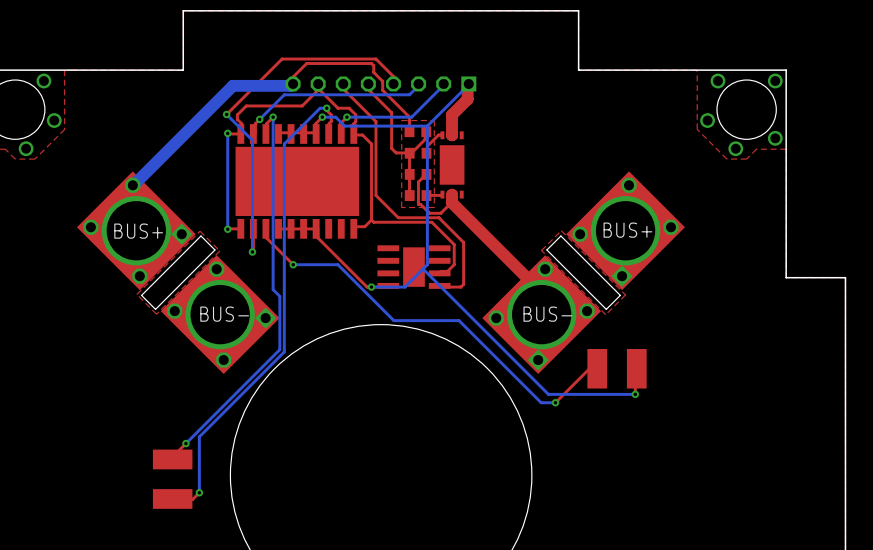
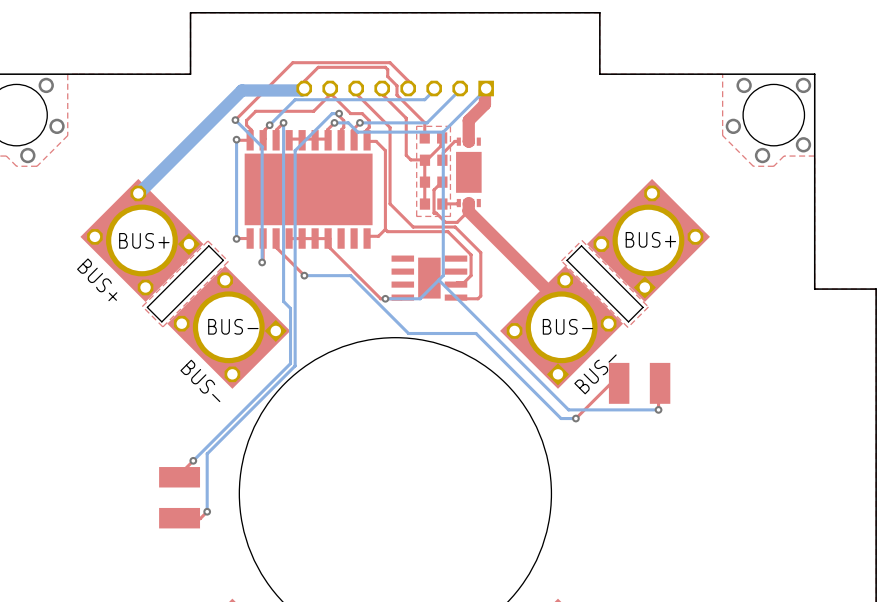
text: none -> BUS+ (97, 279)
text: none -> BUS- (595, 374)
text: none -> BUS- (200, 380)

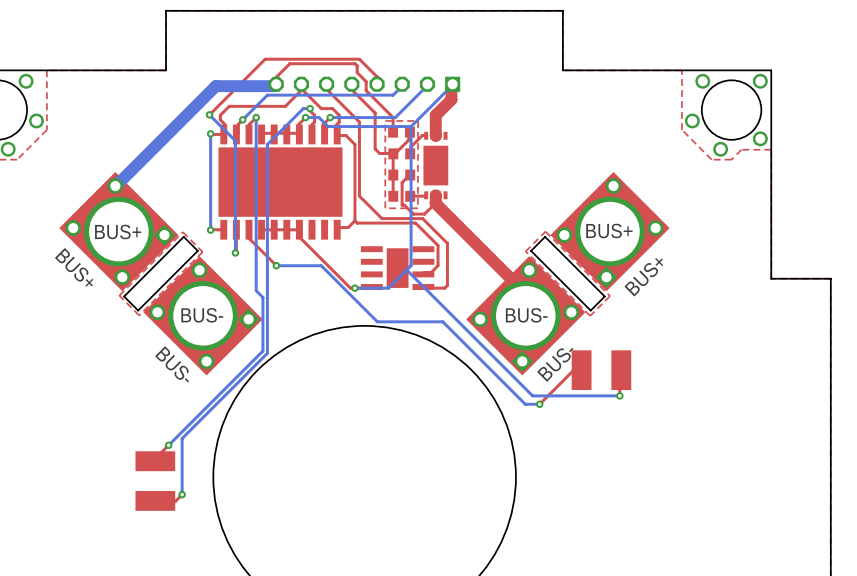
text: none -> BUS+ (643, 277)

